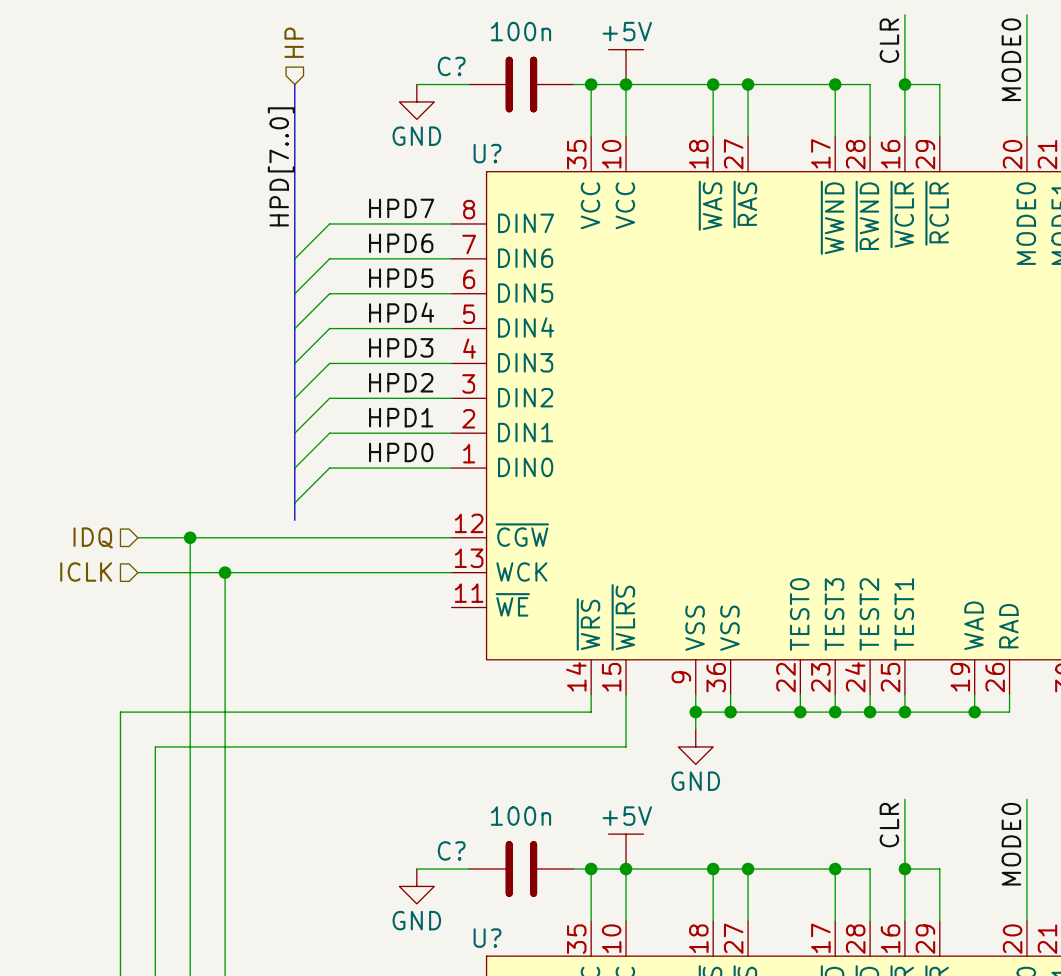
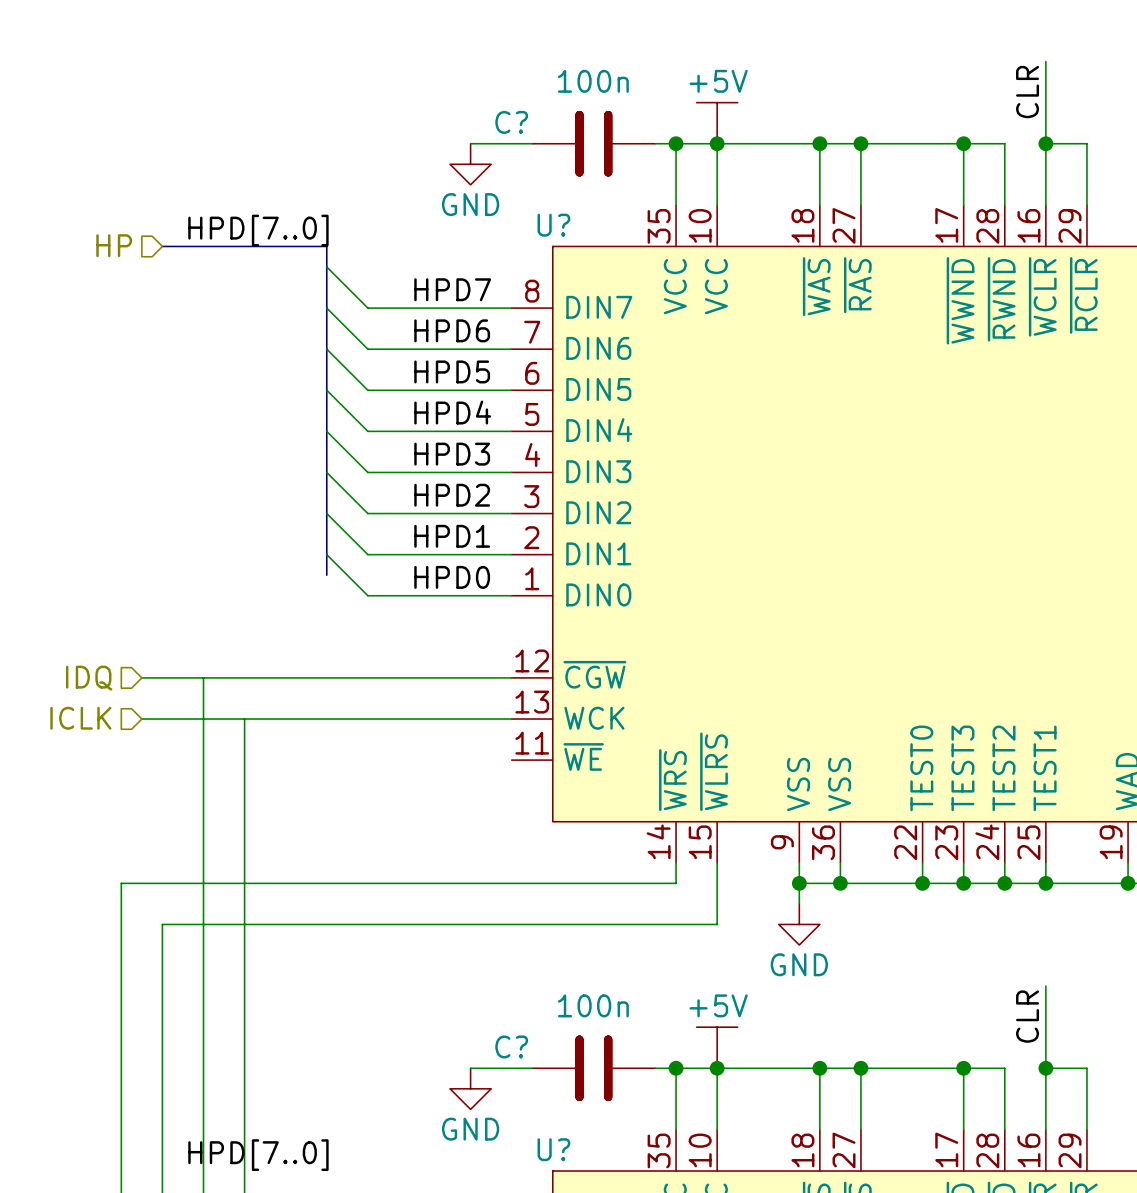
hierarchical label rotation: 0° (294, 42) -> 90° counterclockwise (114, 245)
hierarchical label position: HP (294, 42) -> HP (114, 245)
bus: (294, 84) (294, 171) -> (162, 246) (326, 246)
label rotation: 0° (281, 166) -> 90° clockwise (258, 230)
wire: (329, 223) (294, 258) -> (367, 308) (326, 267)
wire: (329, 258) (294, 293) -> (367, 349) (326, 308)
wire: none -> (326, 390) (367, 431)
wire: (329, 293) (294, 328) -> (367, 390) (326, 349)
wire: none -> (326, 431) (367, 472)
wire: (329, 328) (294, 363) -> (367, 513) (326, 472)
wire: (329, 363) (294, 398) -> (367, 554) (326, 513)
wire: (329, 398) (294, 433) -> (367, 595) (326, 554)
wire: (329, 433) (294, 468) -> none
bus: (294, 450) (294, 520) -> none
wire: (329, 468) (294, 502) -> none
junction: (190, 537) -> none
junction: (225, 572) -> none
label: none -> HPD[7..0] (258, 1155)

